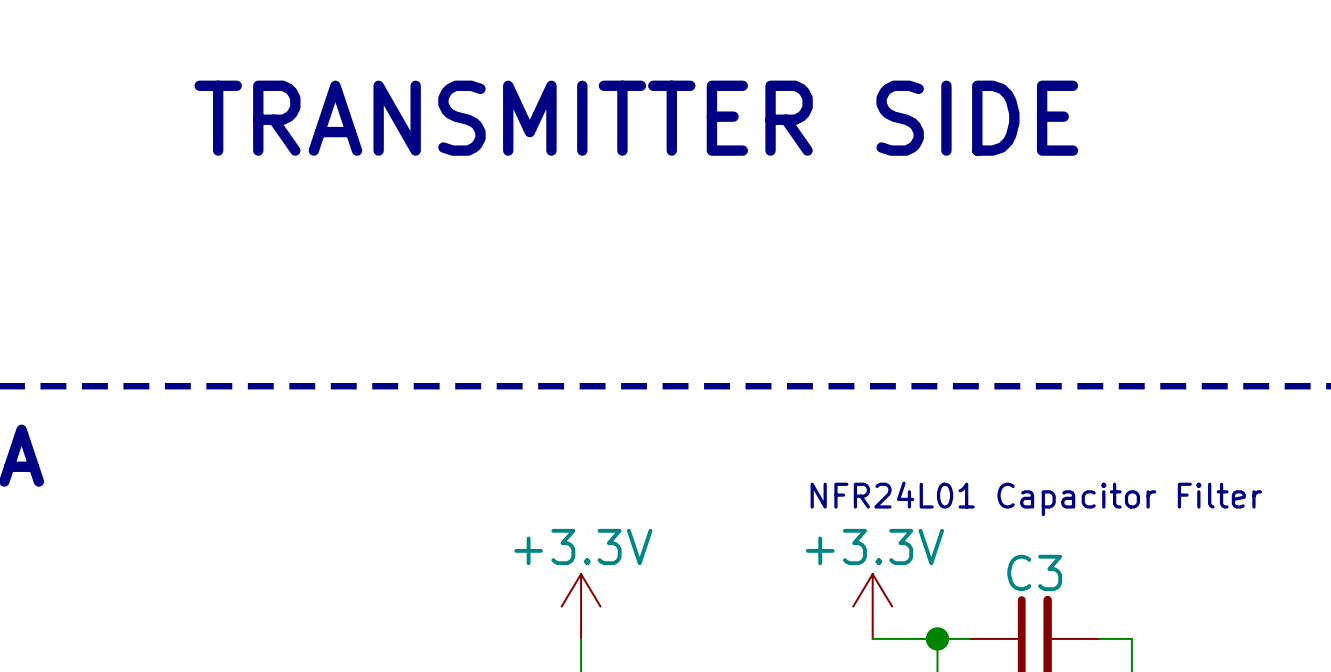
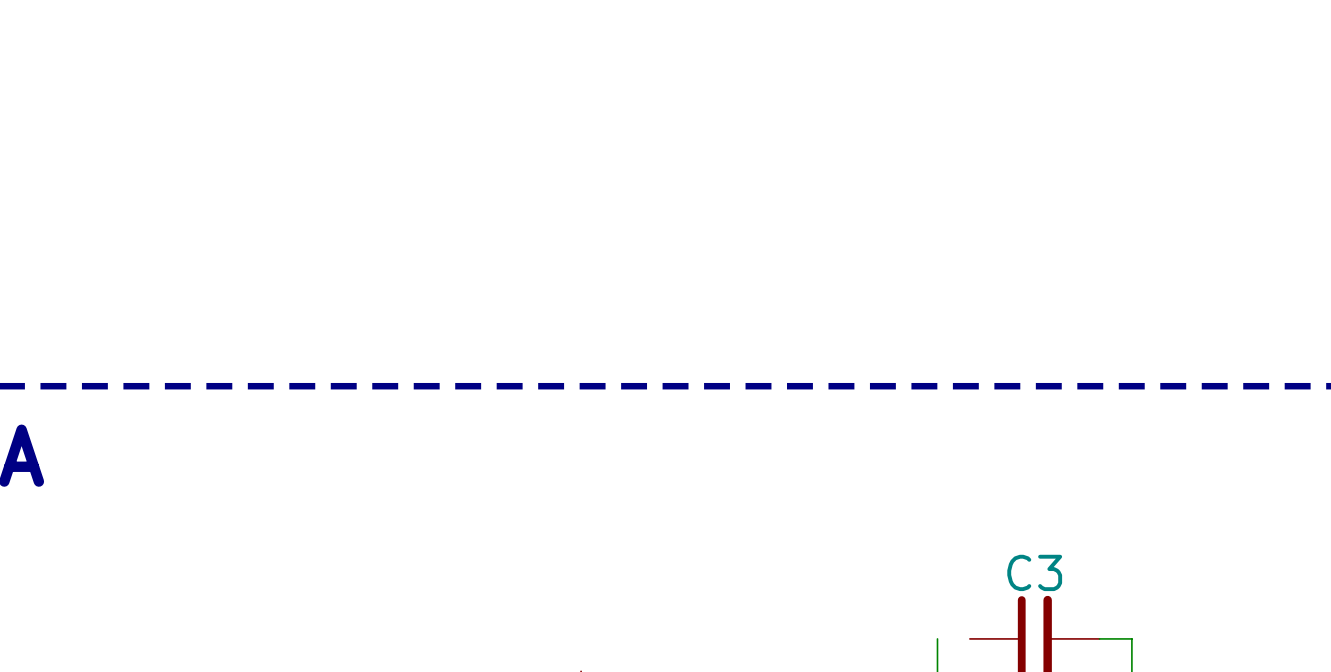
text: TRANSMITTER SIDE (636, 118) -> none
text: NFR24L01 Capacitor Filter (1036, 498) -> none
power symbol: +3.3V (581, 606) -> none
power symbol: +3.3V (872, 606) -> none
wire: (581, 638) (581, 671) -> none
wire: (872, 638) (969, 638) -> none
junction: (937, 638) -> none

